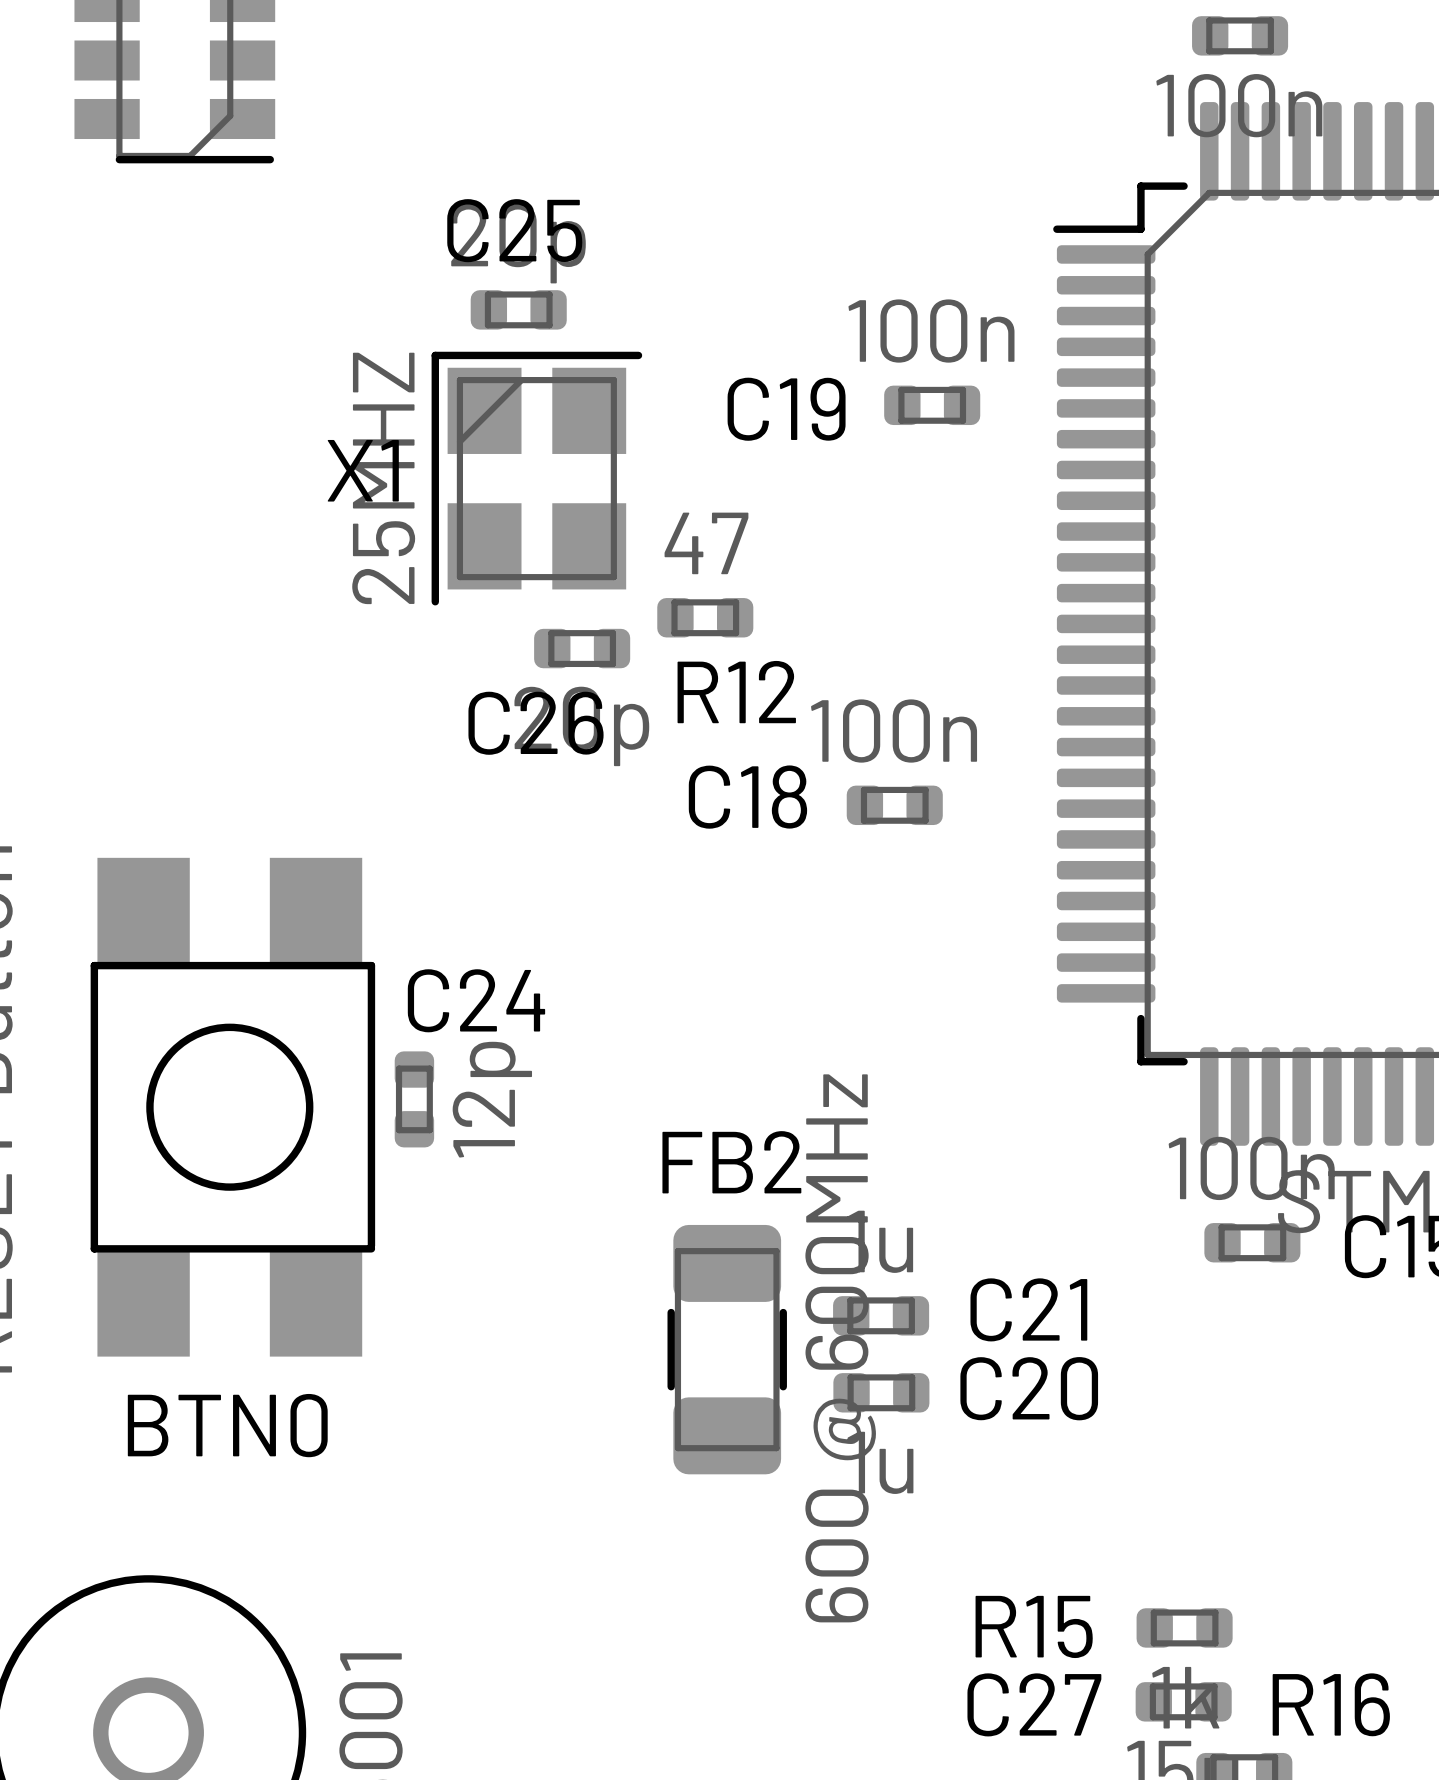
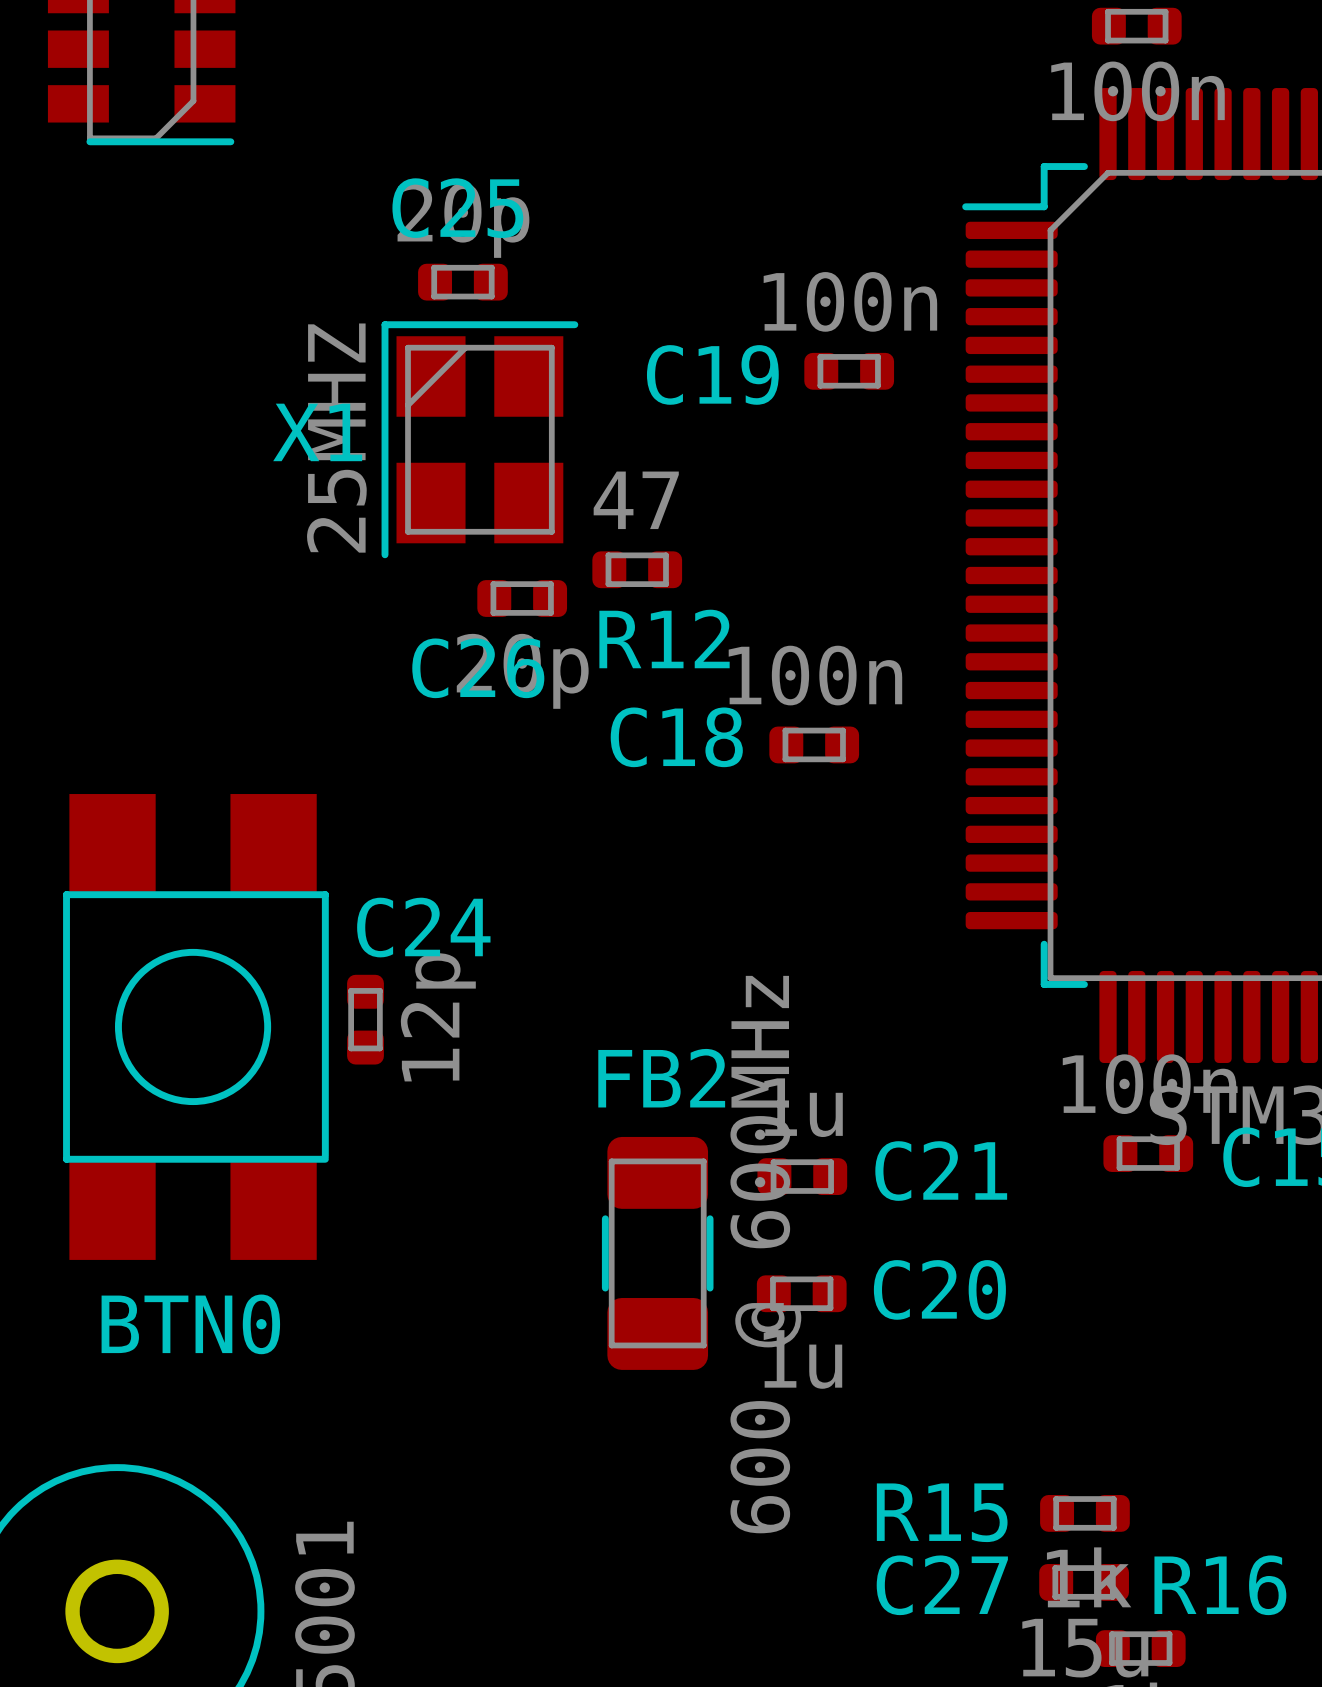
C21 position: (881, 1315) -> (802, 1176)

